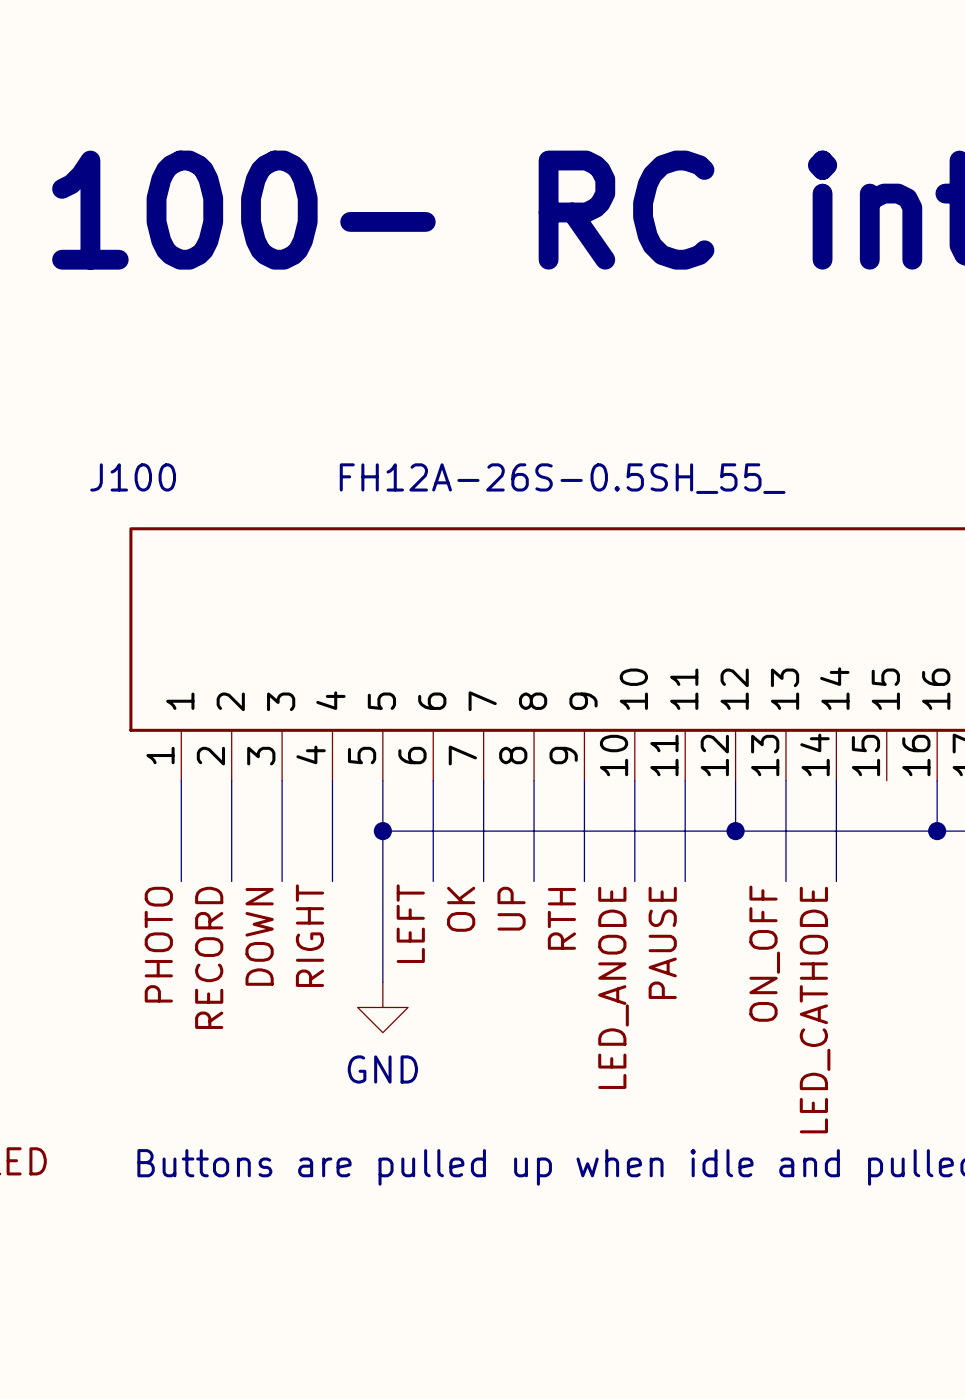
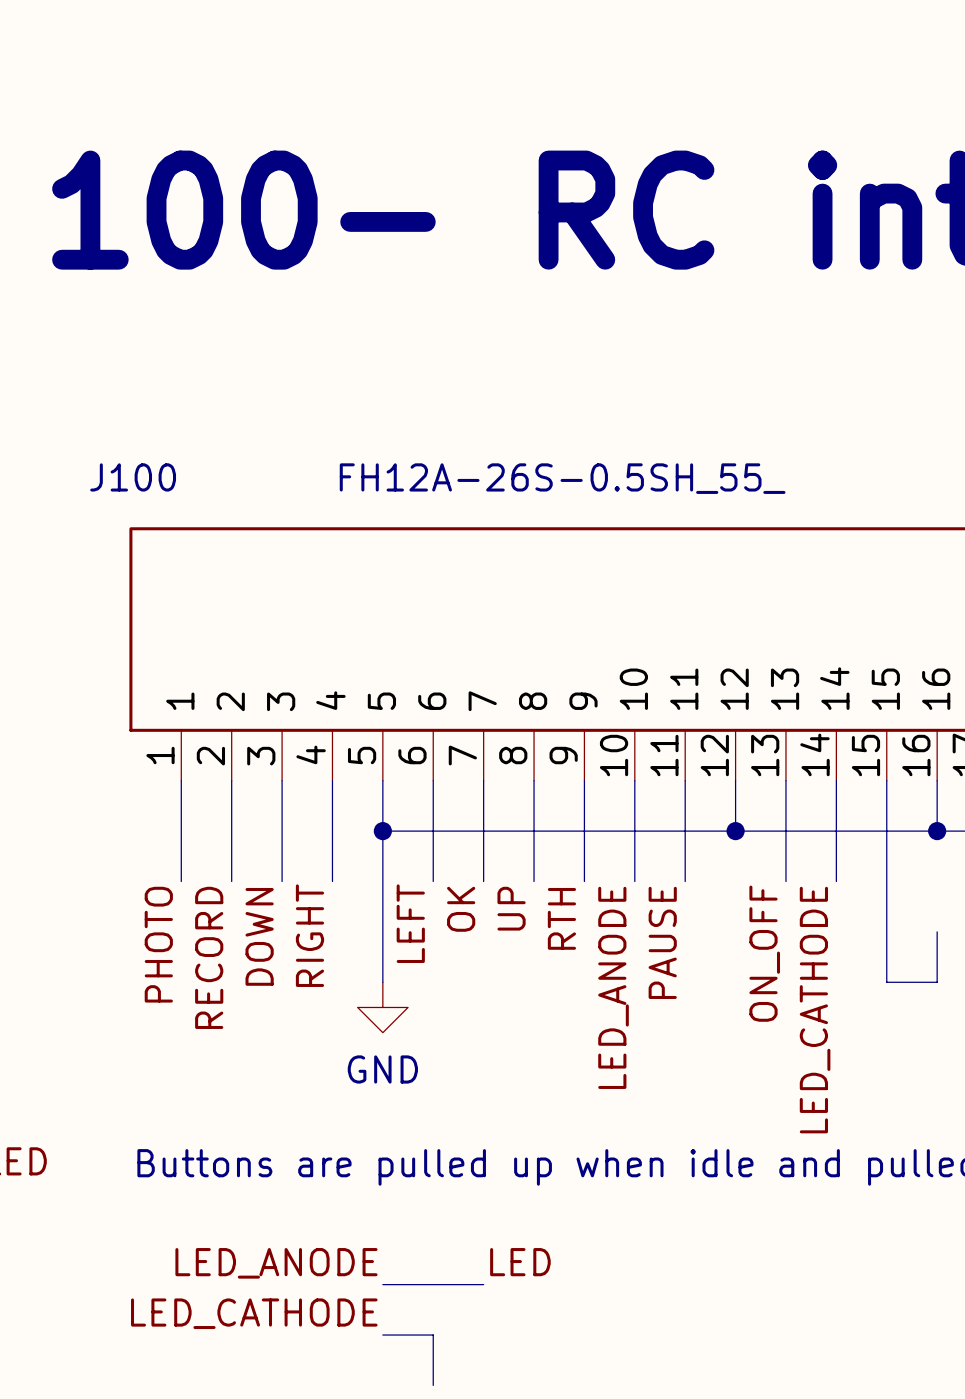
wire: none -> (886, 780) (886, 982) (937, 982) (937, 931)
label: none -> LED (520, 1262)
label: none -> LED_ANODE (276, 1263)
wire: none -> (382, 1284) (483, 1284)
label: none -> LED_CATHODE (254, 1313)
wire: none -> (382, 1335) (433, 1335) (433, 1385)

